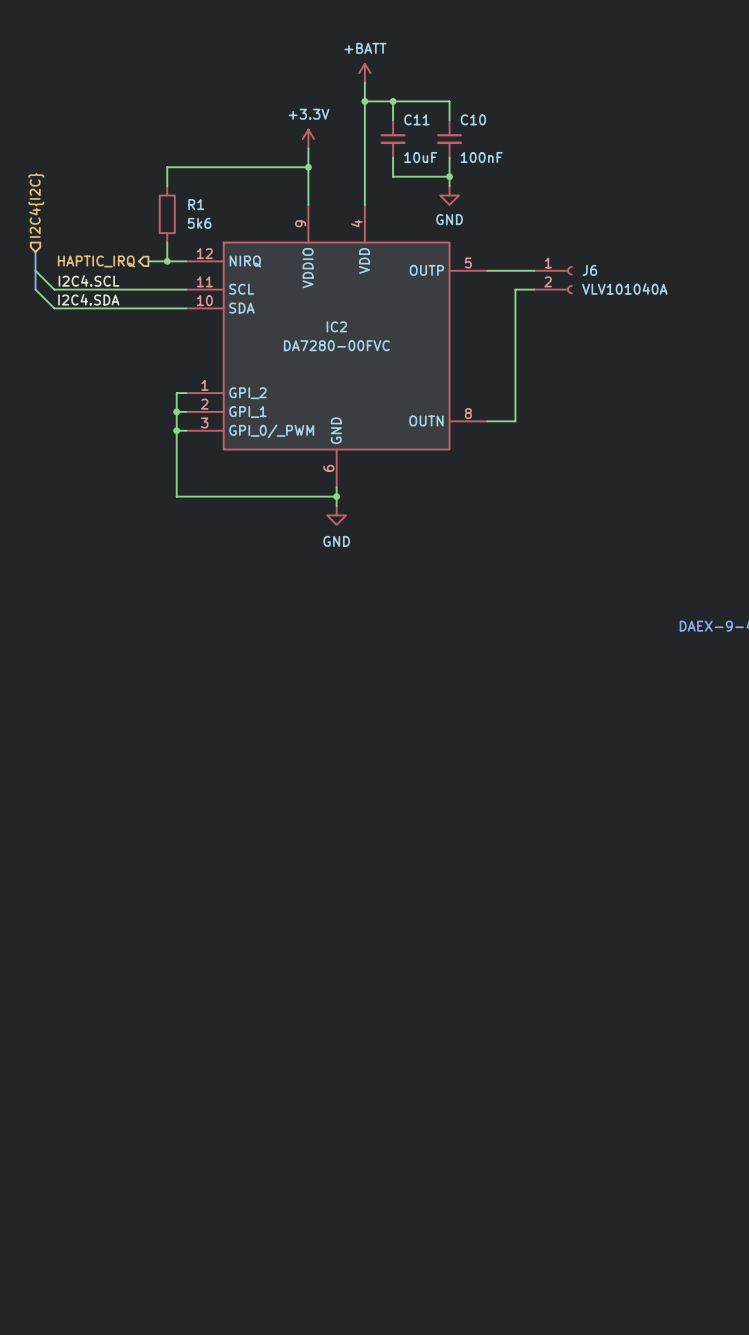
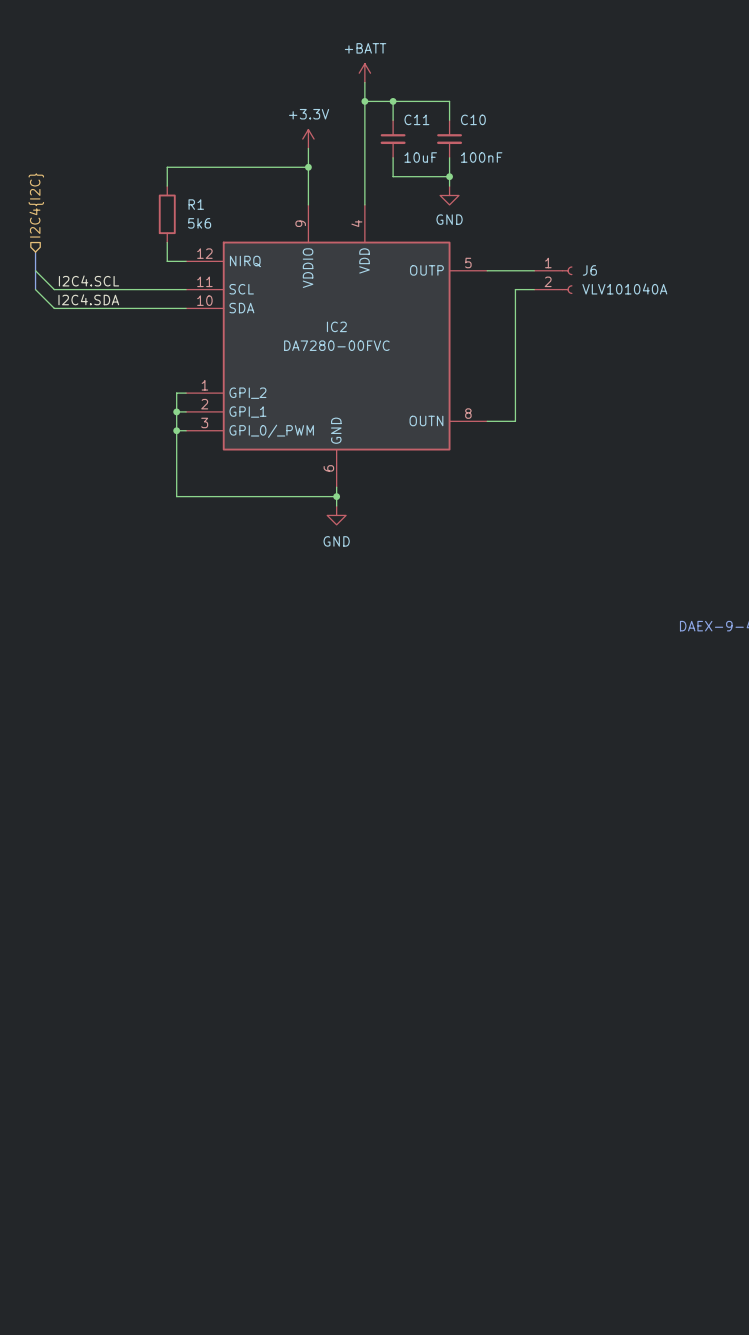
hierarchical label: HAPTIC_IRQ (96, 261) -> none
wire: (148, 261) (167, 261) -> none
junction: (167, 261) -> none

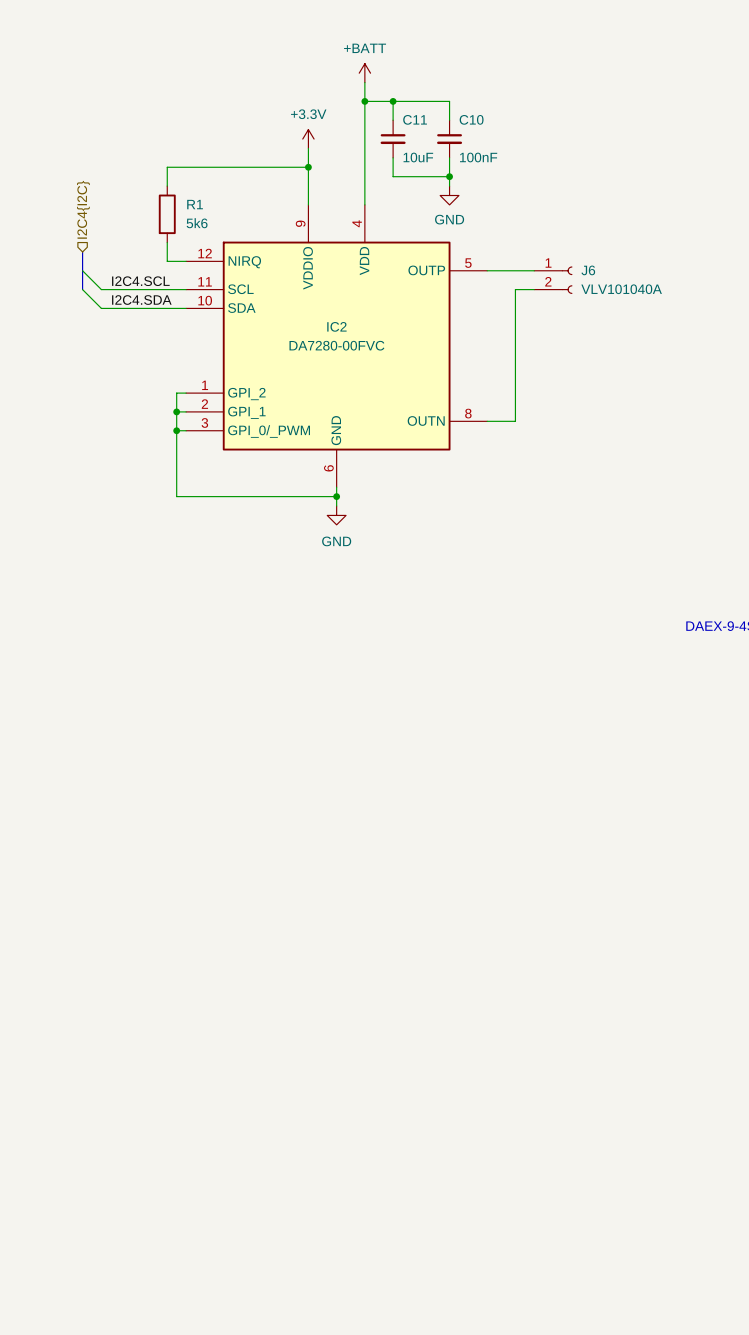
hierarchical label position: I2C4{I2C} (36, 205) -> I2C4{I2C} (83, 209)
bus: (35, 251) (35, 289) -> (82, 251) (82, 289)
wire: (35, 270) (54, 289) (101, 289) -> (82, 270) (101, 289)
label position: I2C4.SCL (89, 280) -> I2C4.SCL (140, 281)
wire: (35, 289) (54, 308) (101, 308) -> (82, 289) (101, 308)
label position: I2C4.SDA (88, 299) -> I2C4.SDA (141, 300)

